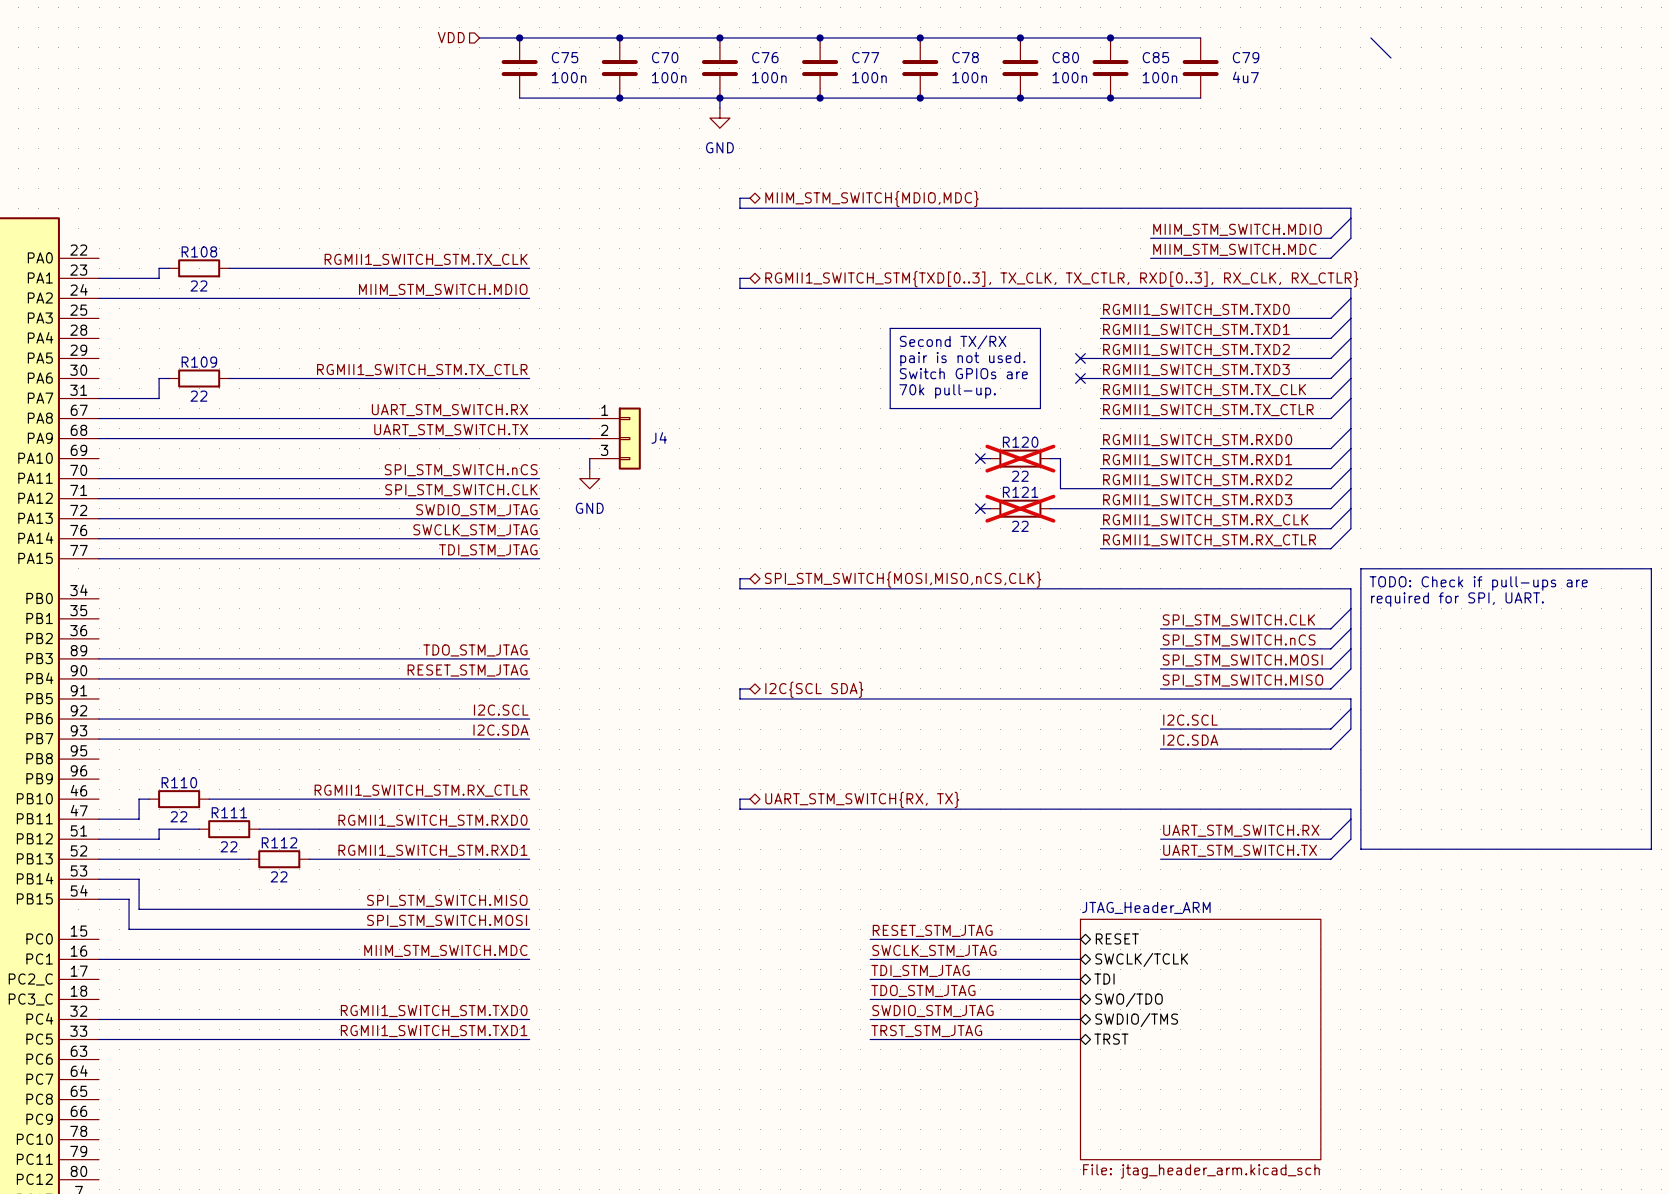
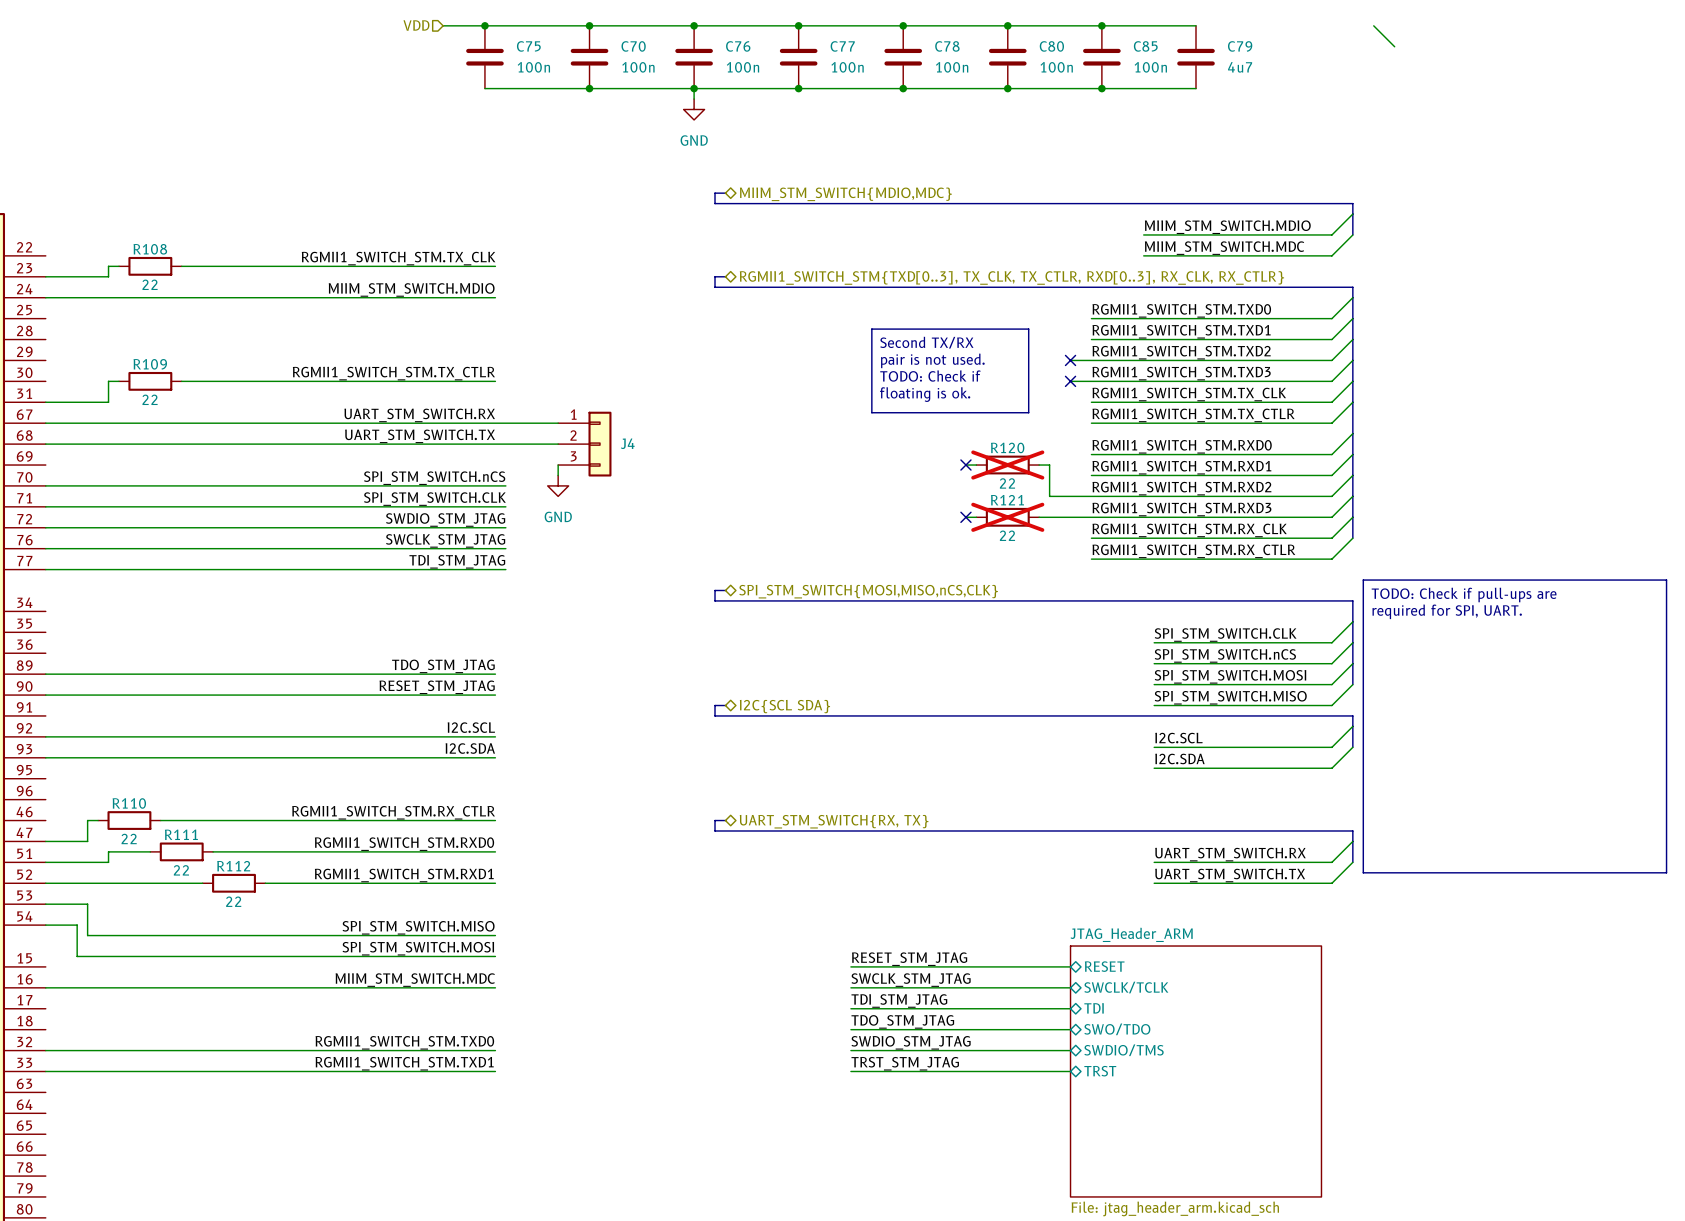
text: Switch GPIOs are (963, 373) -> TODO: Check if (930, 376)
text: 70k pull-up. (947, 391) -> floating is ok. (925, 394)

